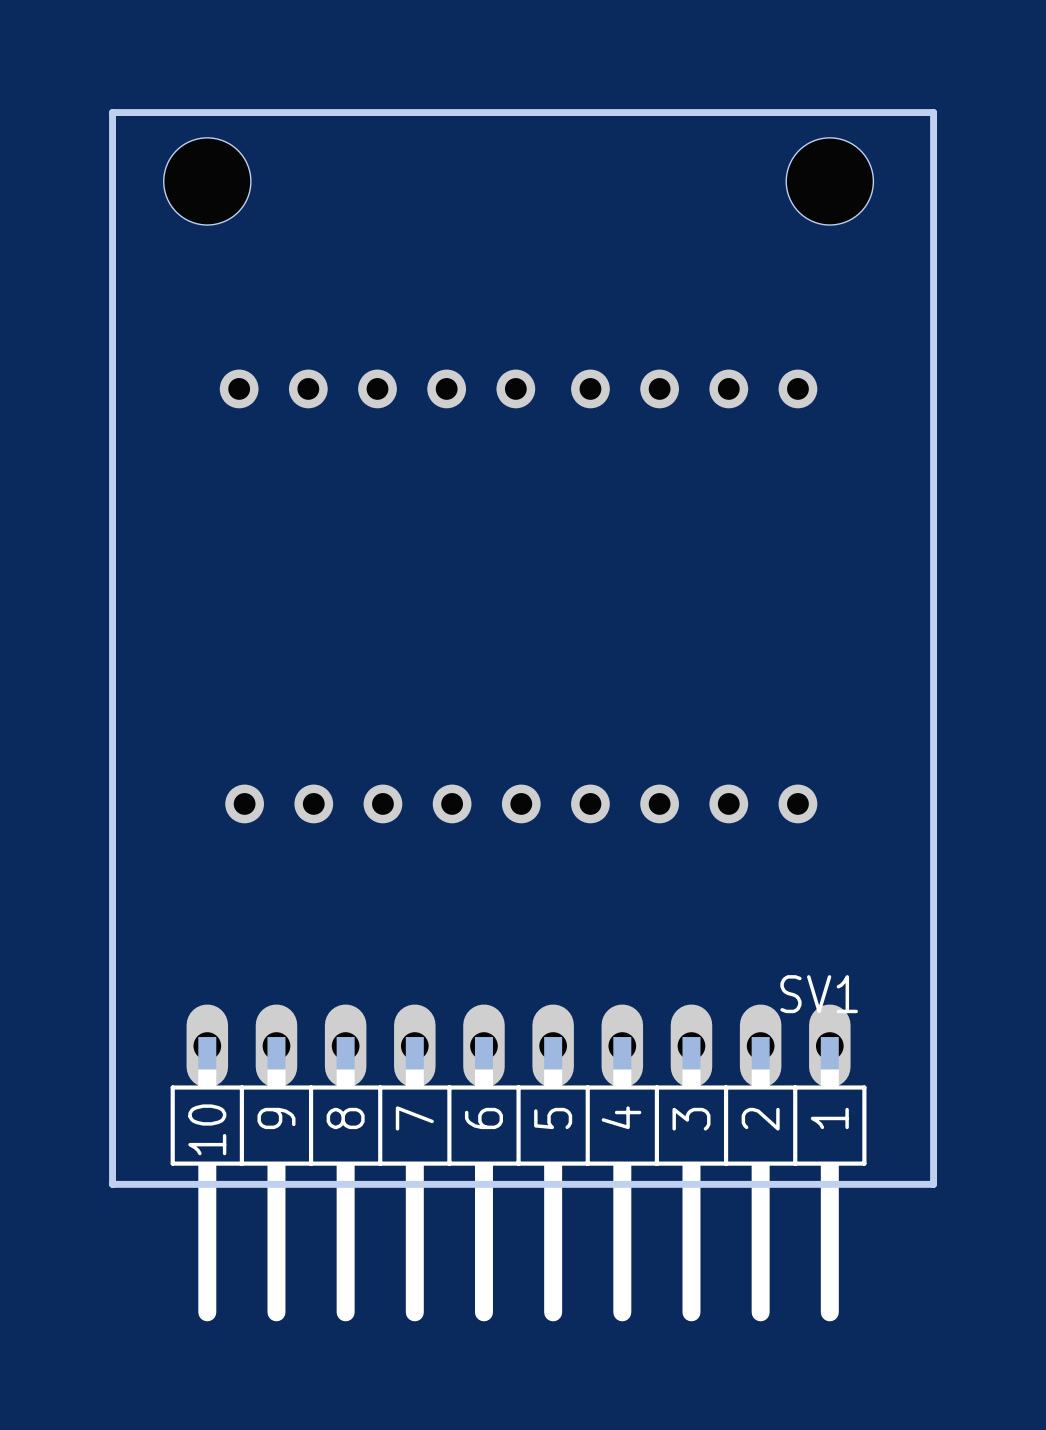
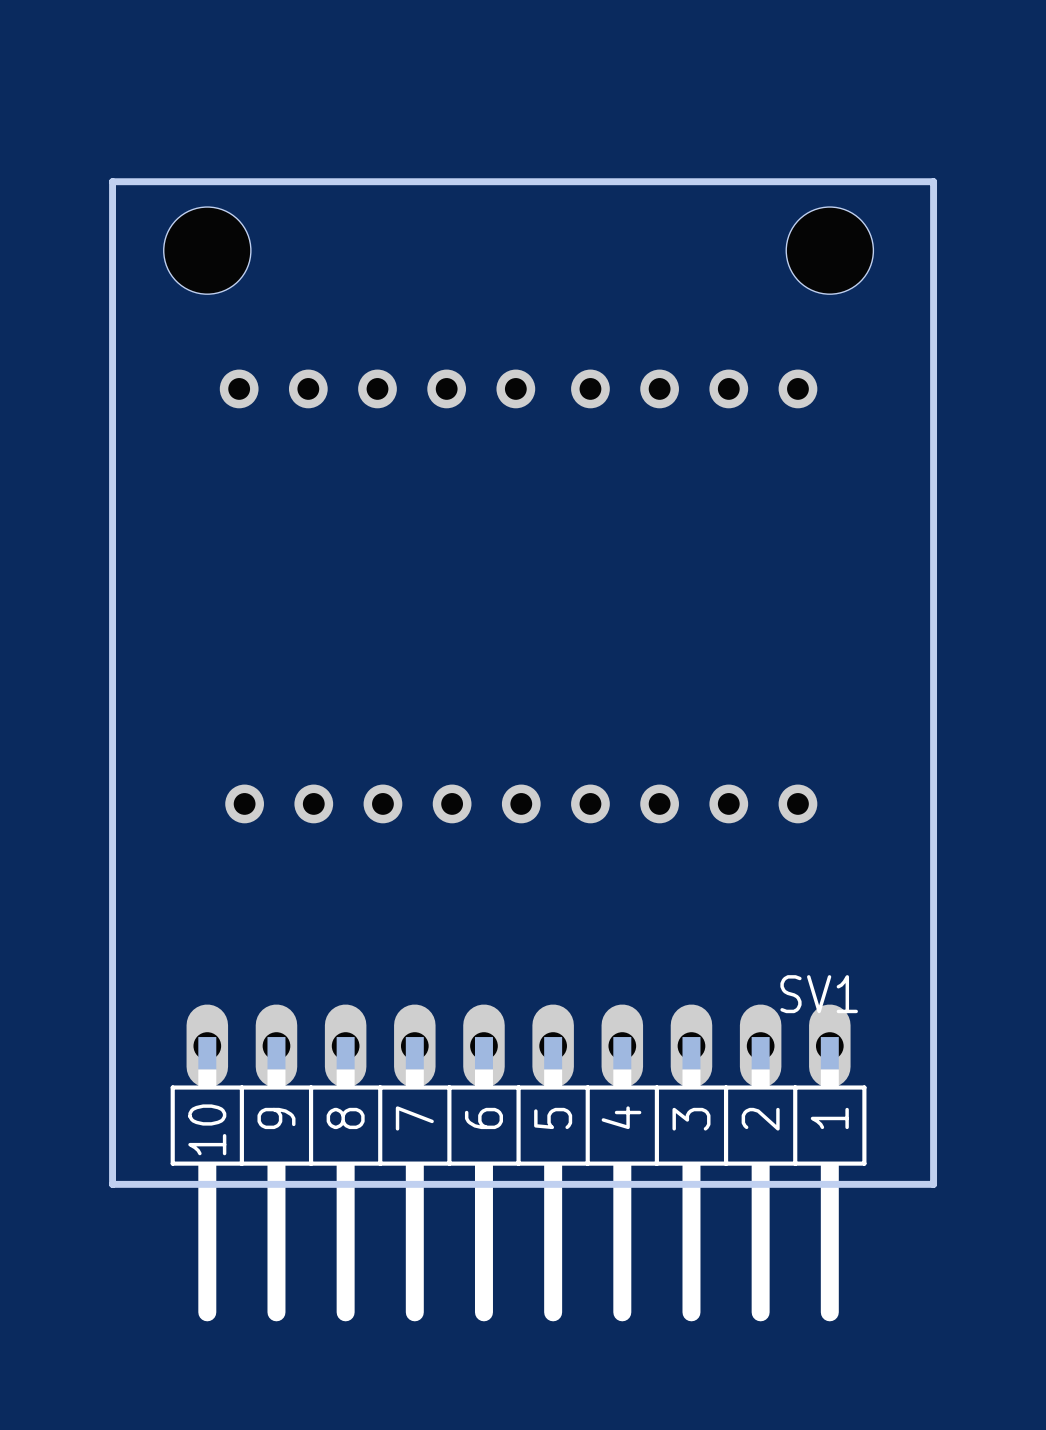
hole position: (207, 181) -> (207, 250)
hole position: (829, 181) -> (829, 250)
board edge: (933, 181) (933, 112) (112, 112) (112, 181) -> (933, 181) (112, 181)

